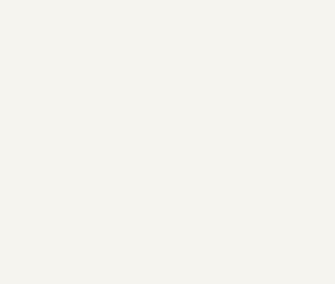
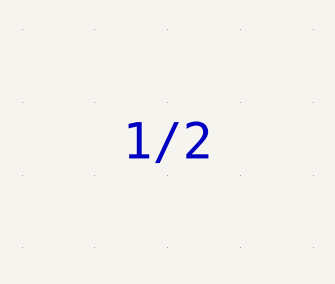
text: none -> 1/2 (168, 142)

